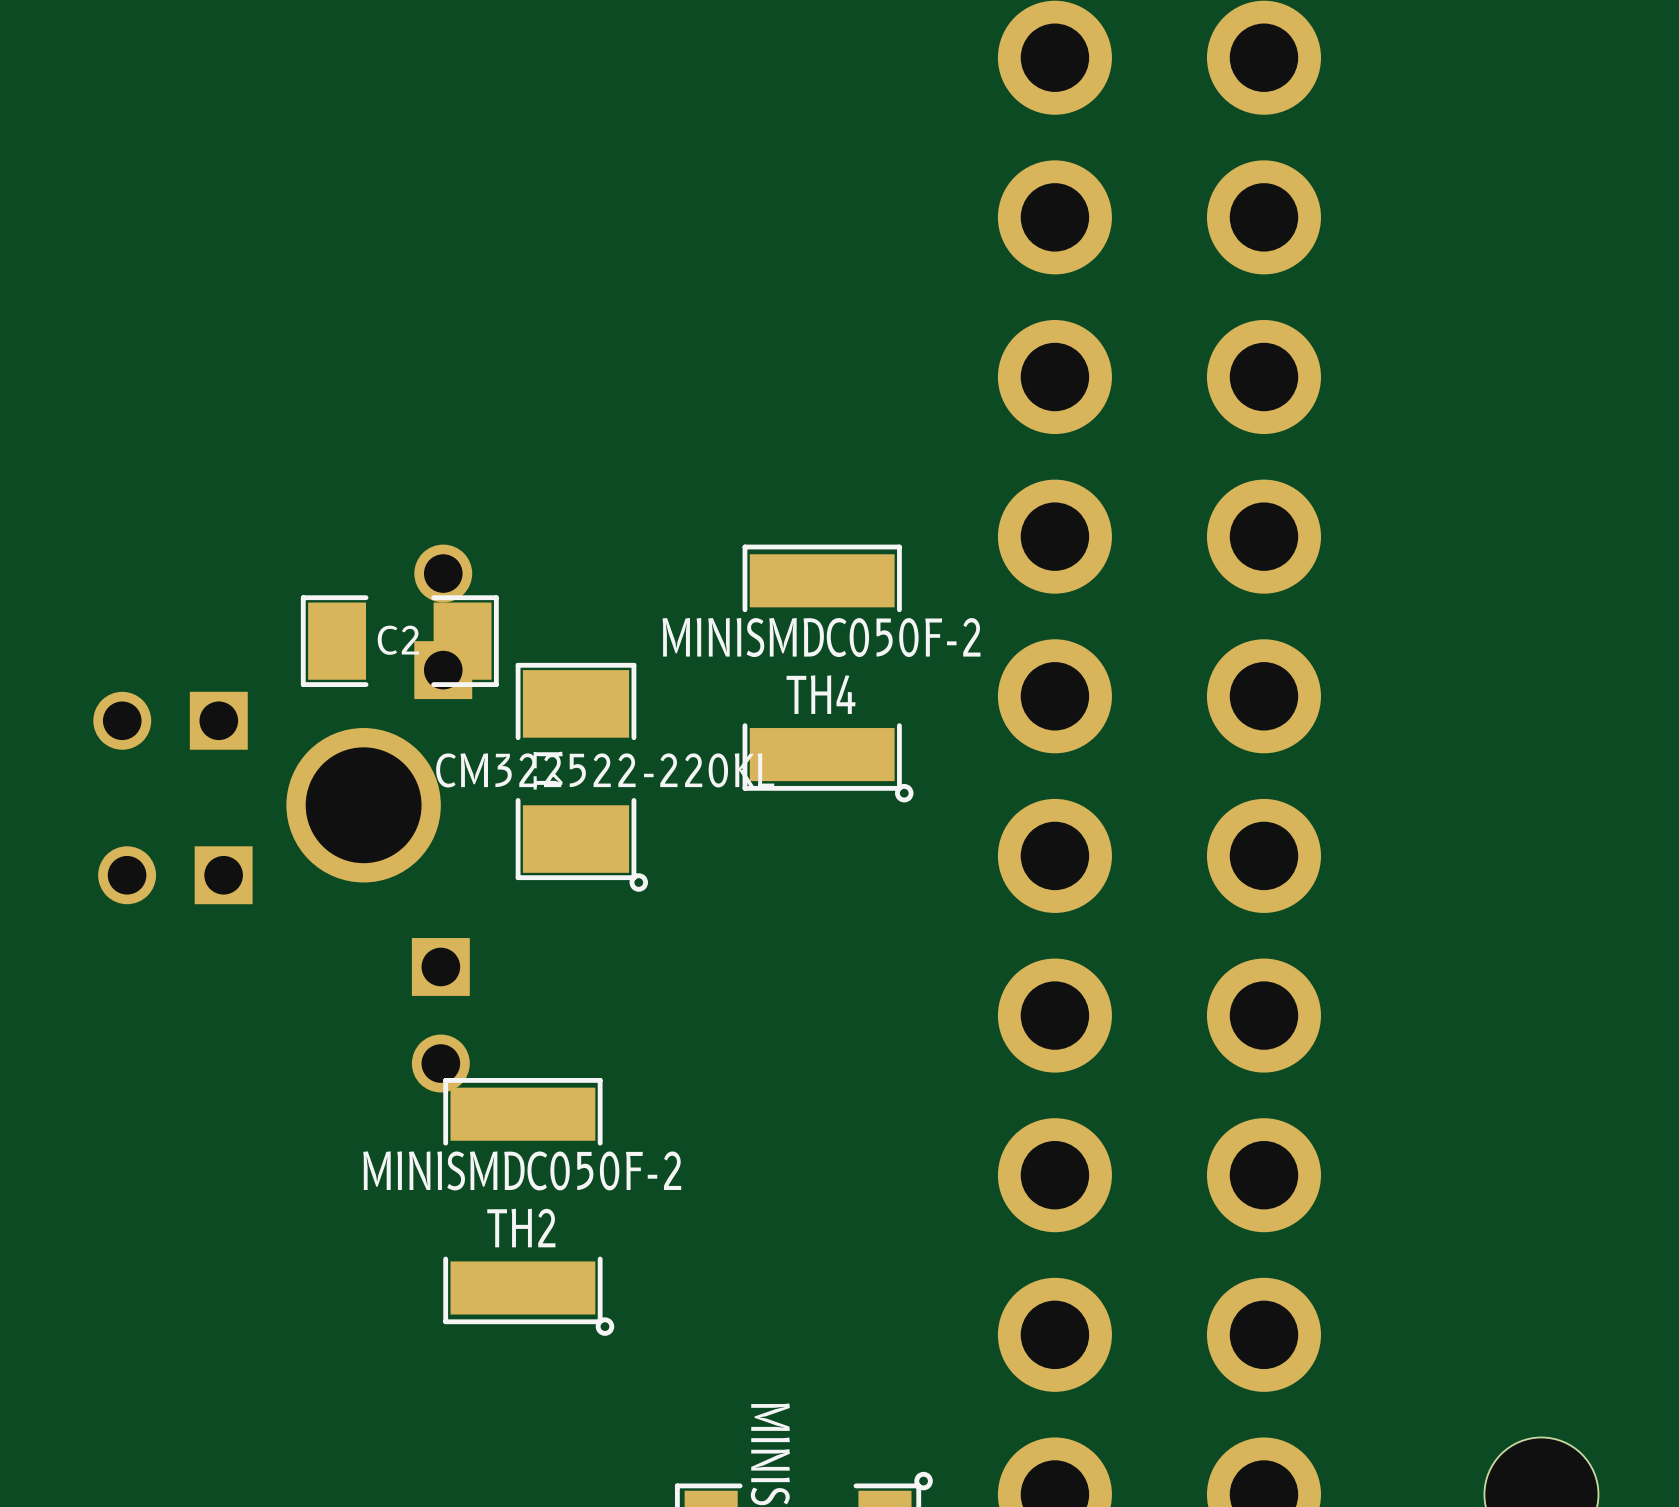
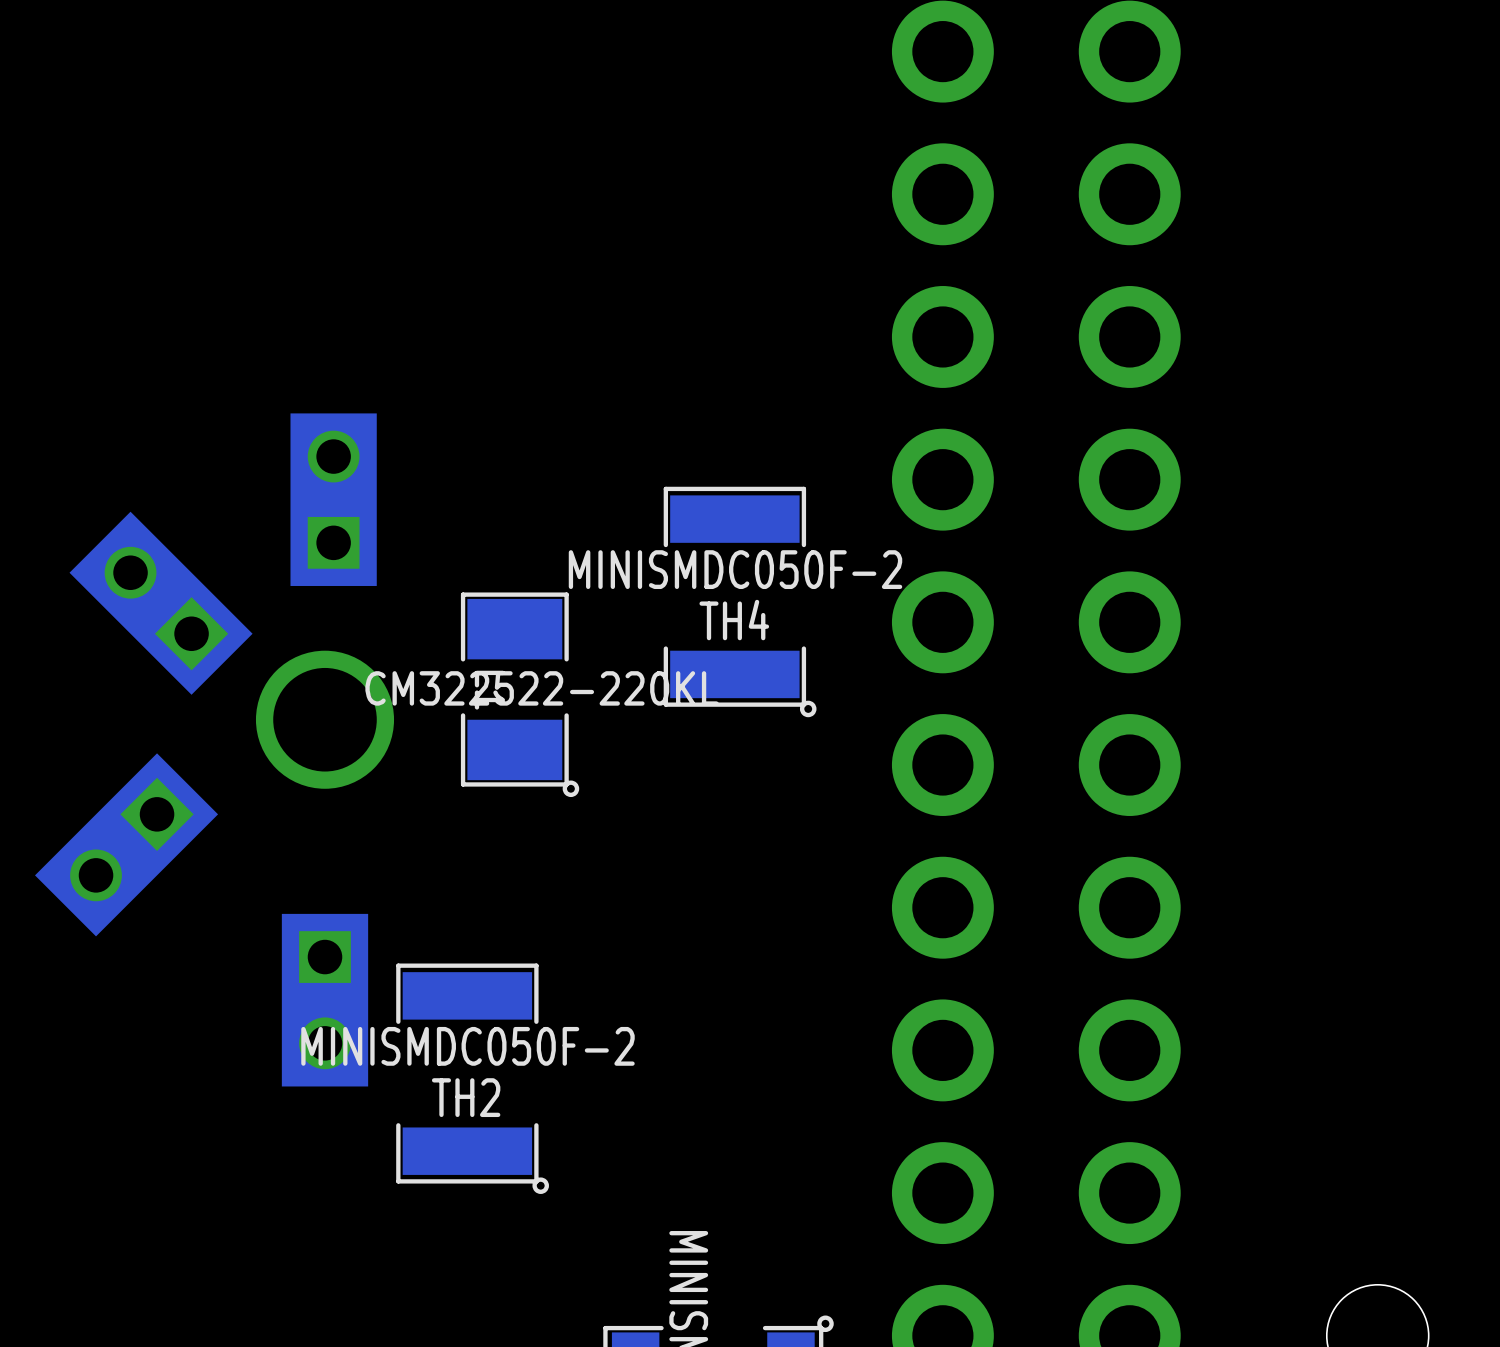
part: none -> (333, 499)
part: (443, 621) -> none
C2: (399, 641) -> none
part: none -> (161, 603)
part: (170, 720) -> none
part: (175, 875) -> none
part: none -> (126, 844)
part: (440, 1015) -> none
part: none -> (325, 1000)

